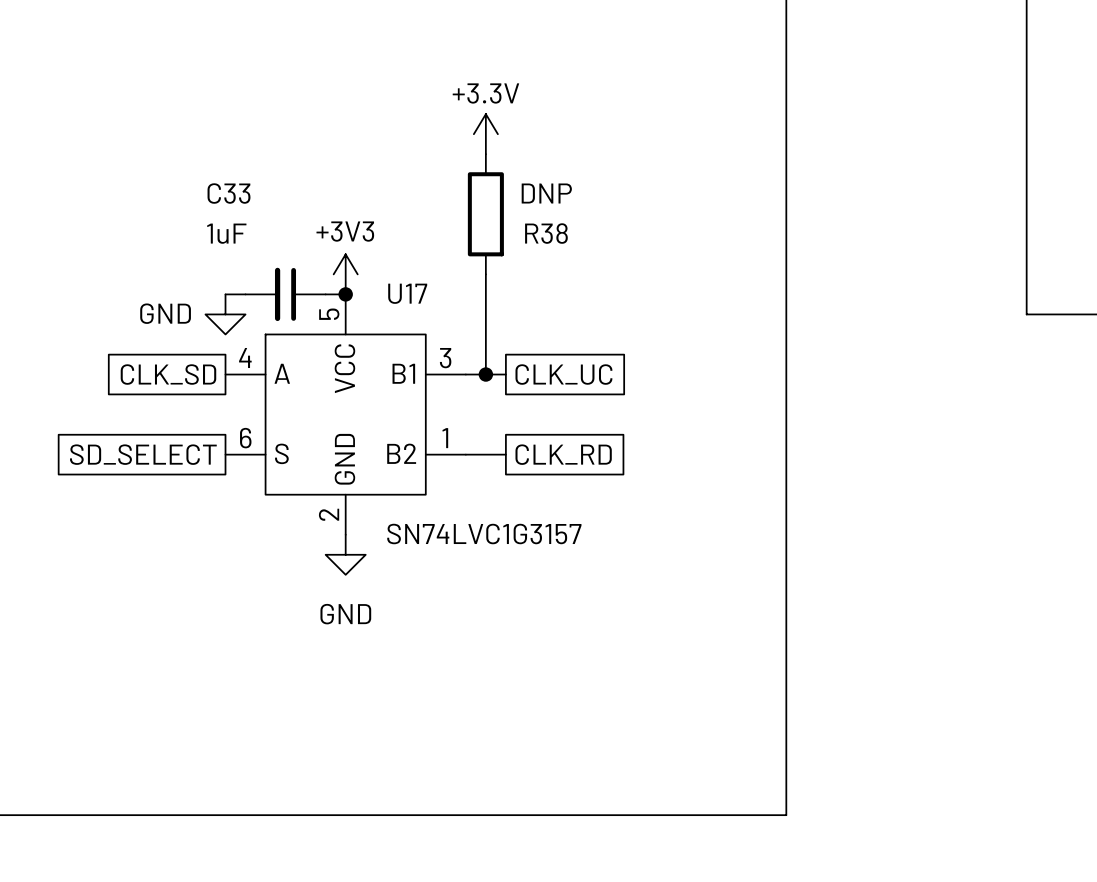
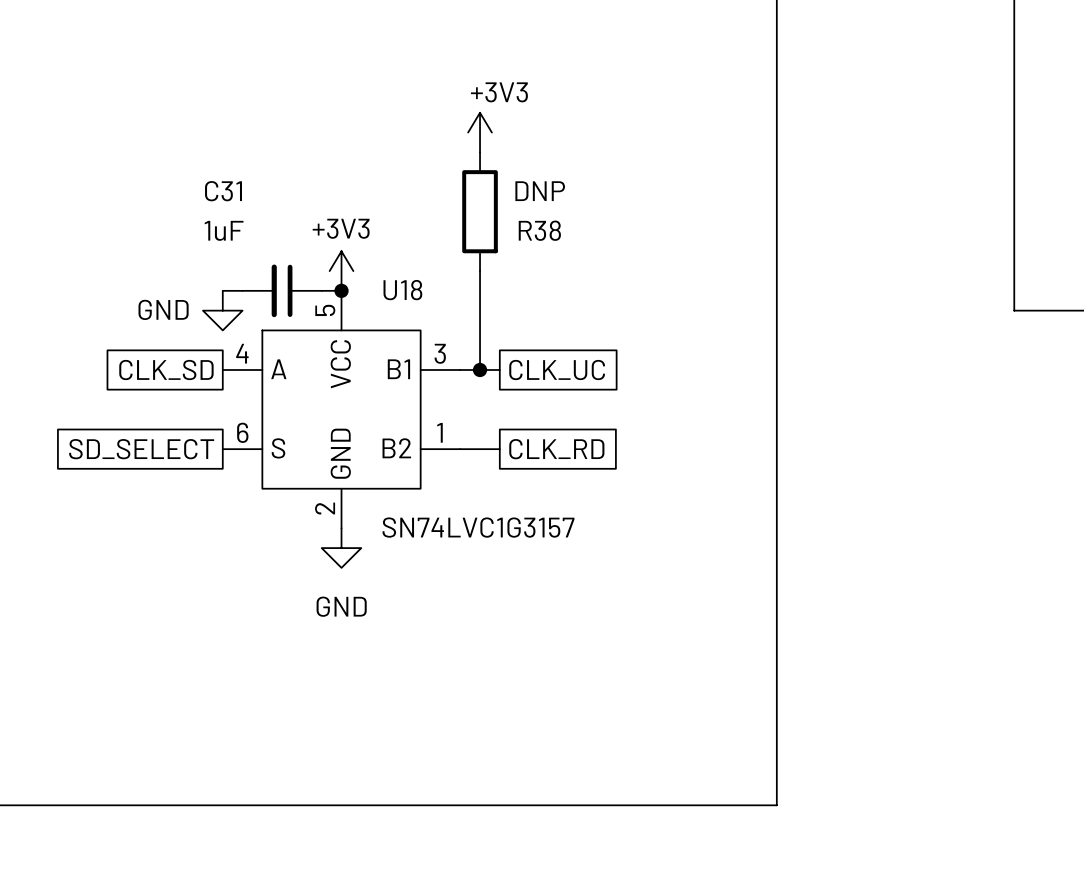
power symbol: +3.3V (485, 134) -> +3V3 (480, 132)
C33 name: C33 (229, 193) -> C31 (223, 191)
U17 name: U17 (407, 293) -> U18 (402, 290)

